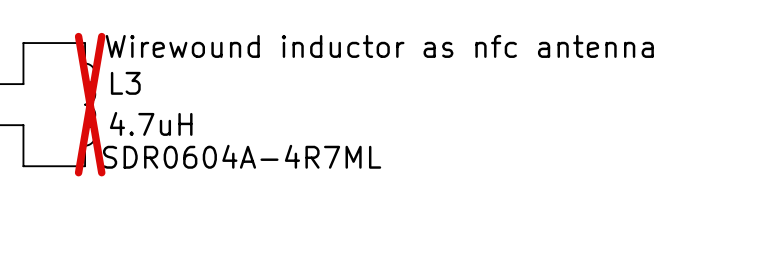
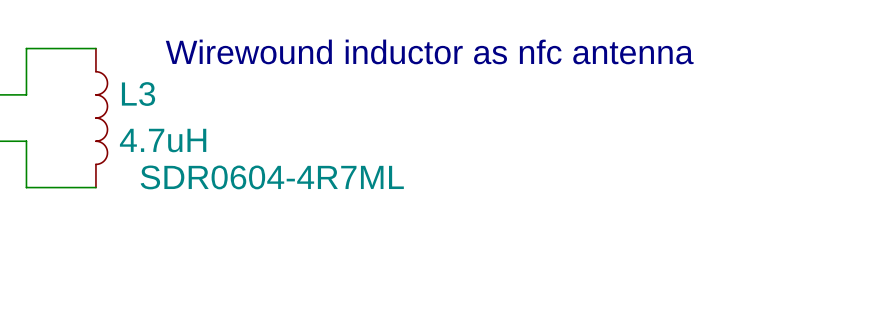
L3 do-not-place cross: (90, 104) -> none
L3 text: SDR0604A-4R7ML (242, 156) -> SDR0604-4R7ML (272, 177)

